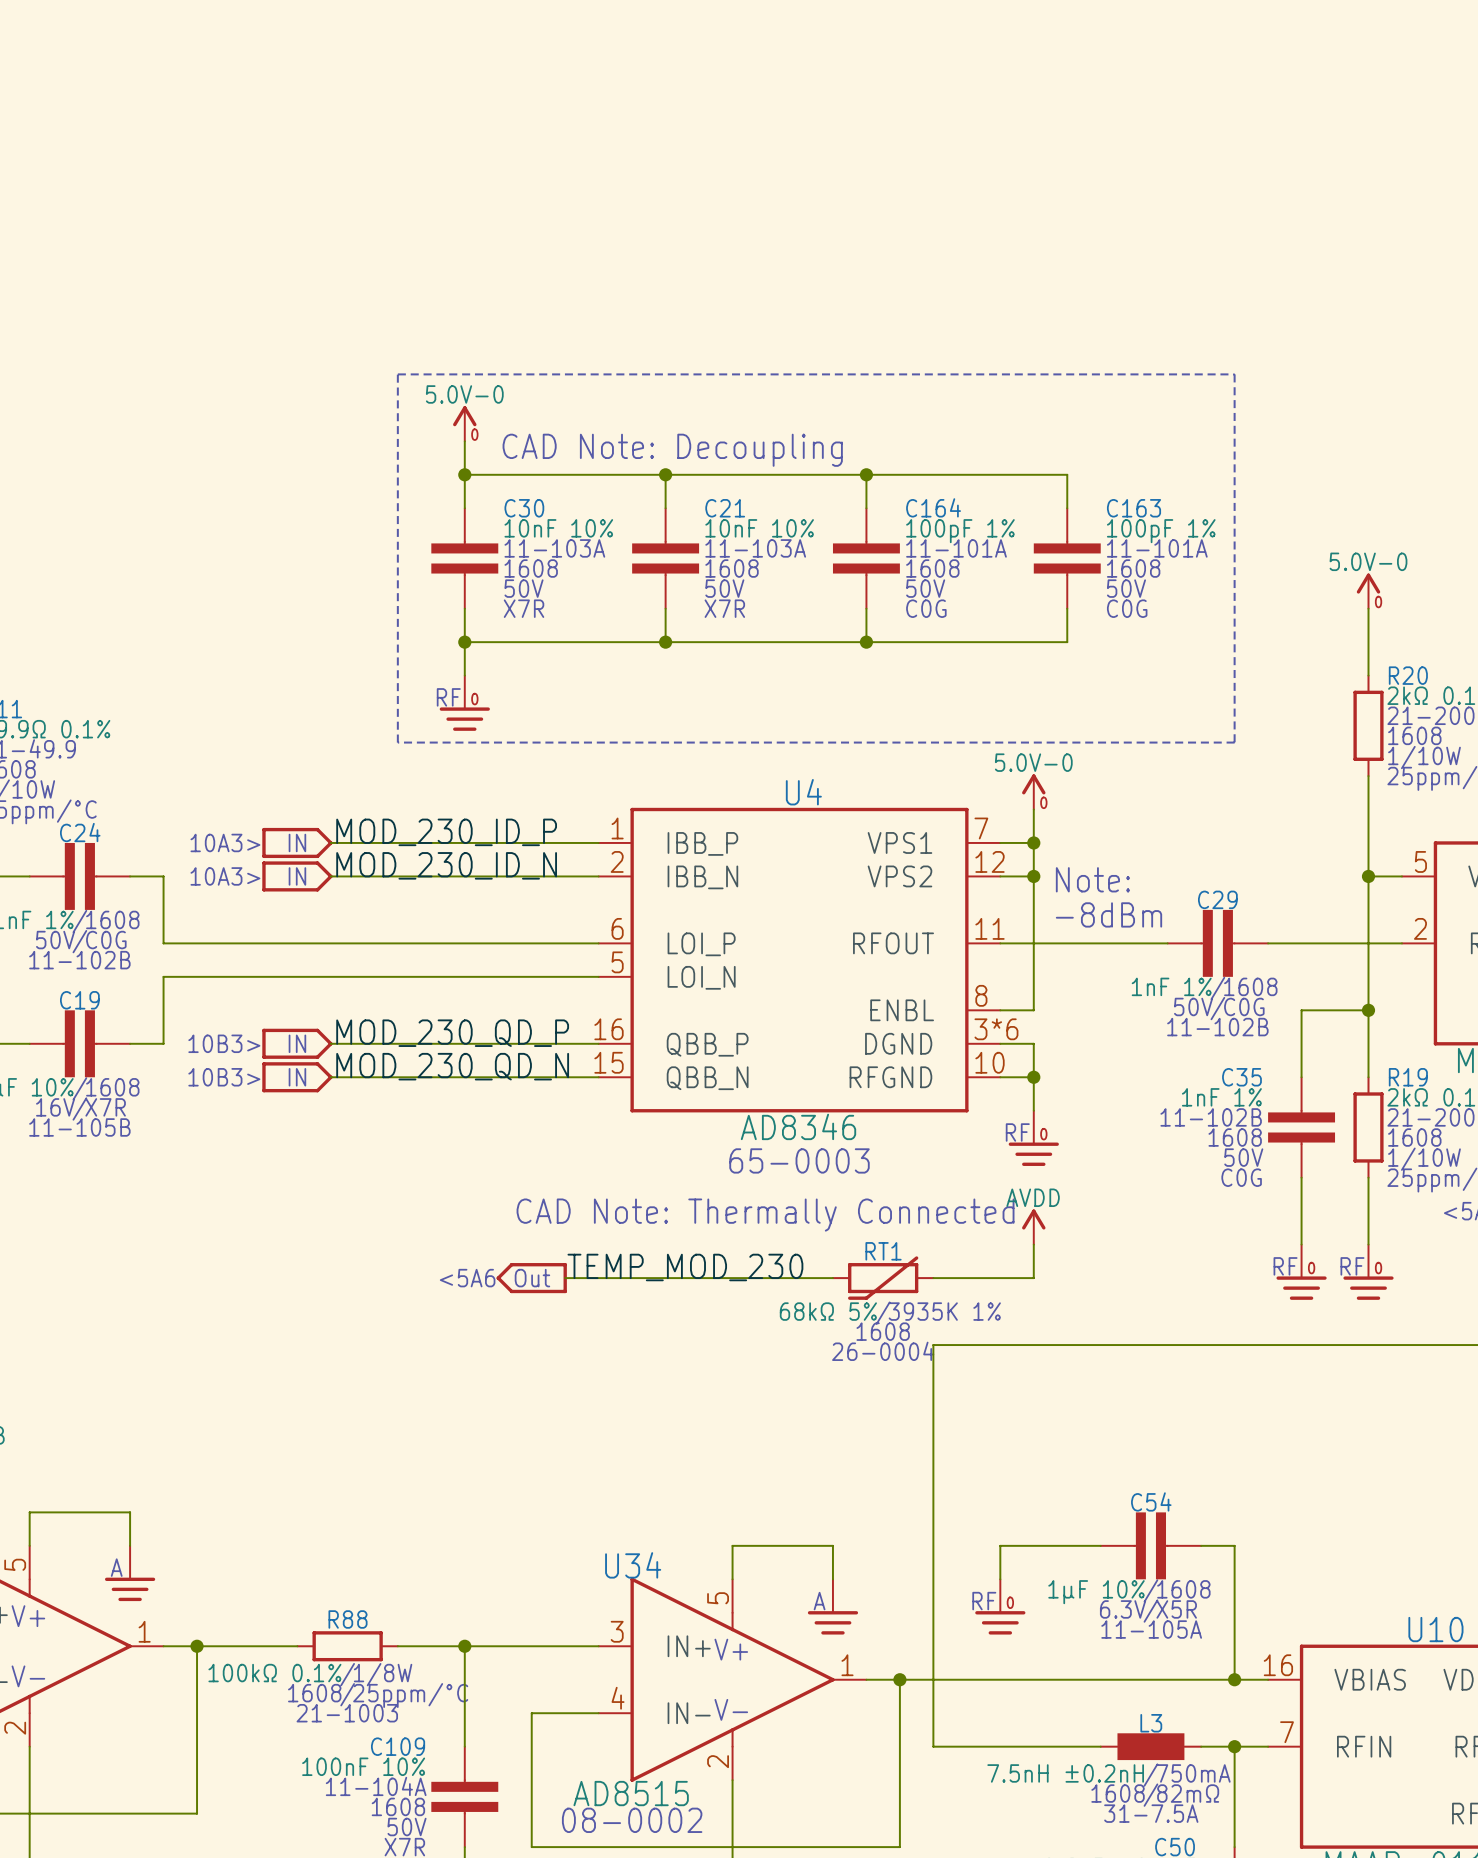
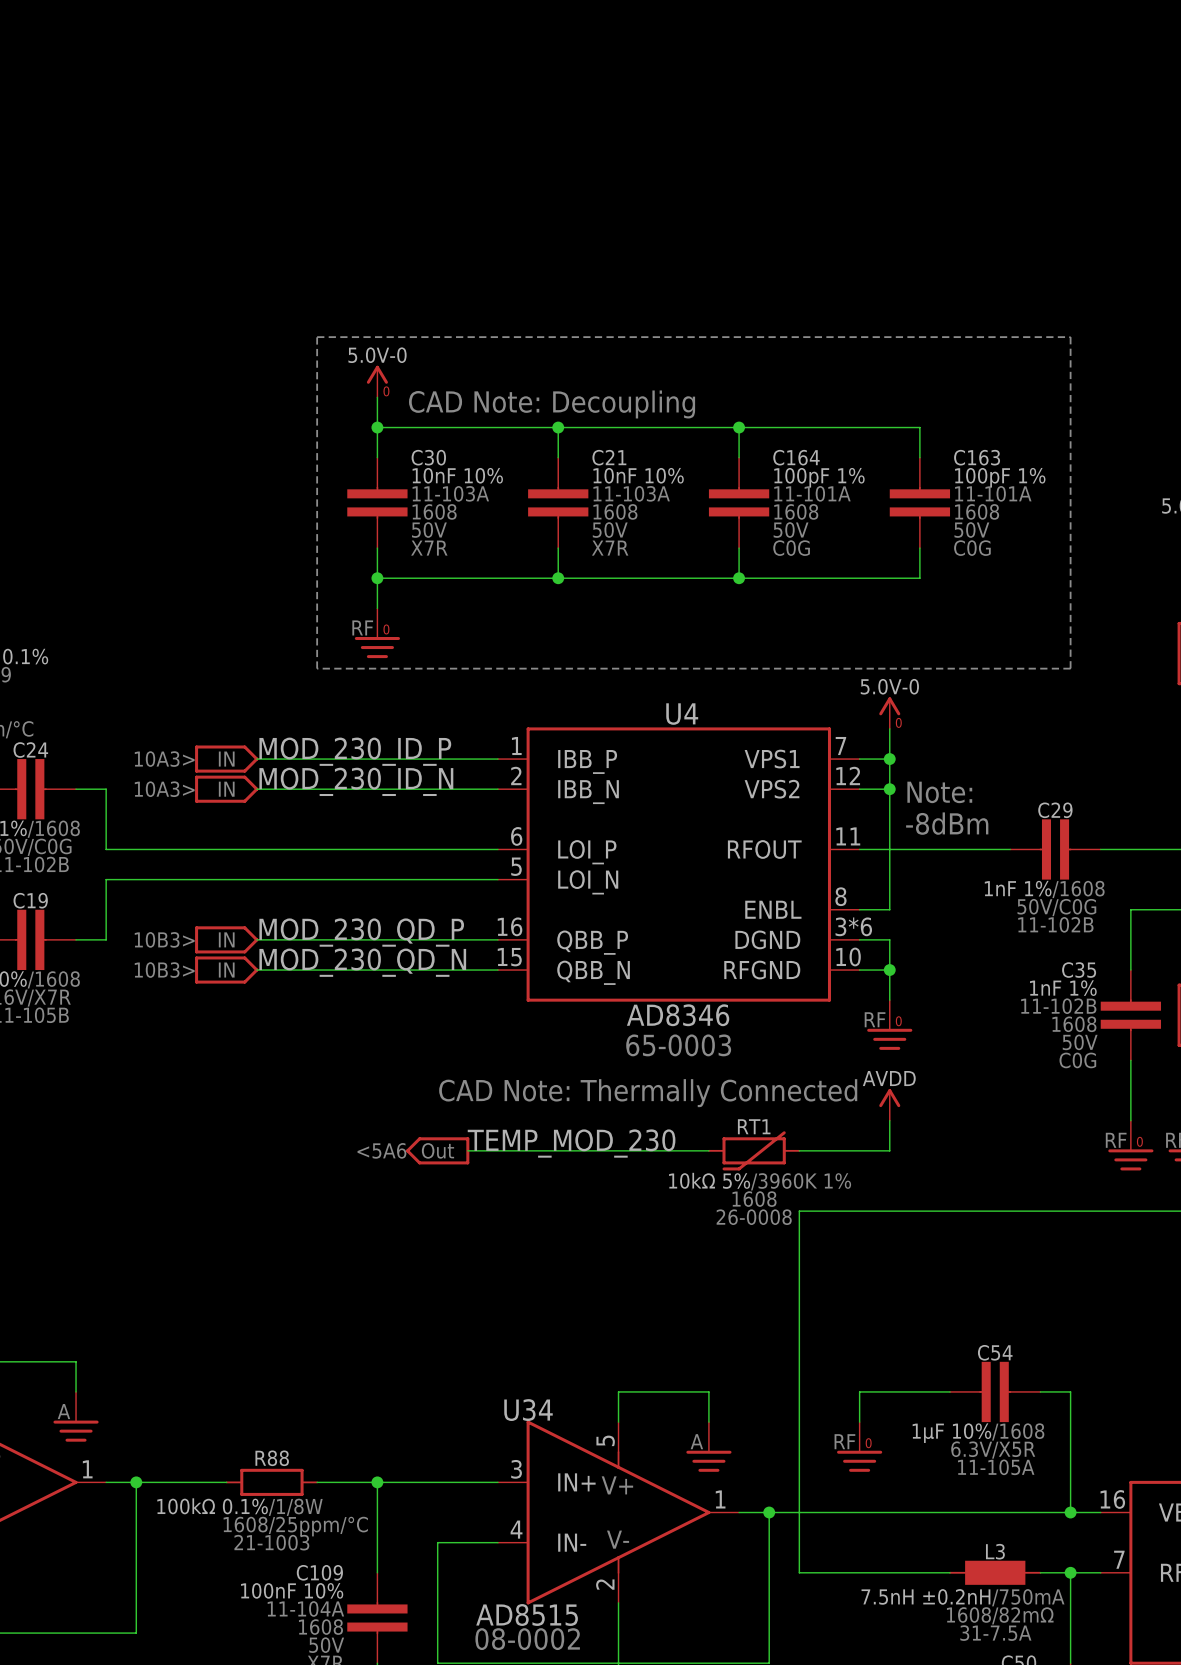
RT1 value: 68kΩ 5% (828, 1311) -> 10kΩ 5% (709, 1180)
RT1 text: 3935K 1% (944, 1311) -> 3960K 1% (804, 1181)
RT1 text: 26-0004 (883, 1351) -> 26-0008 (754, 1217)

